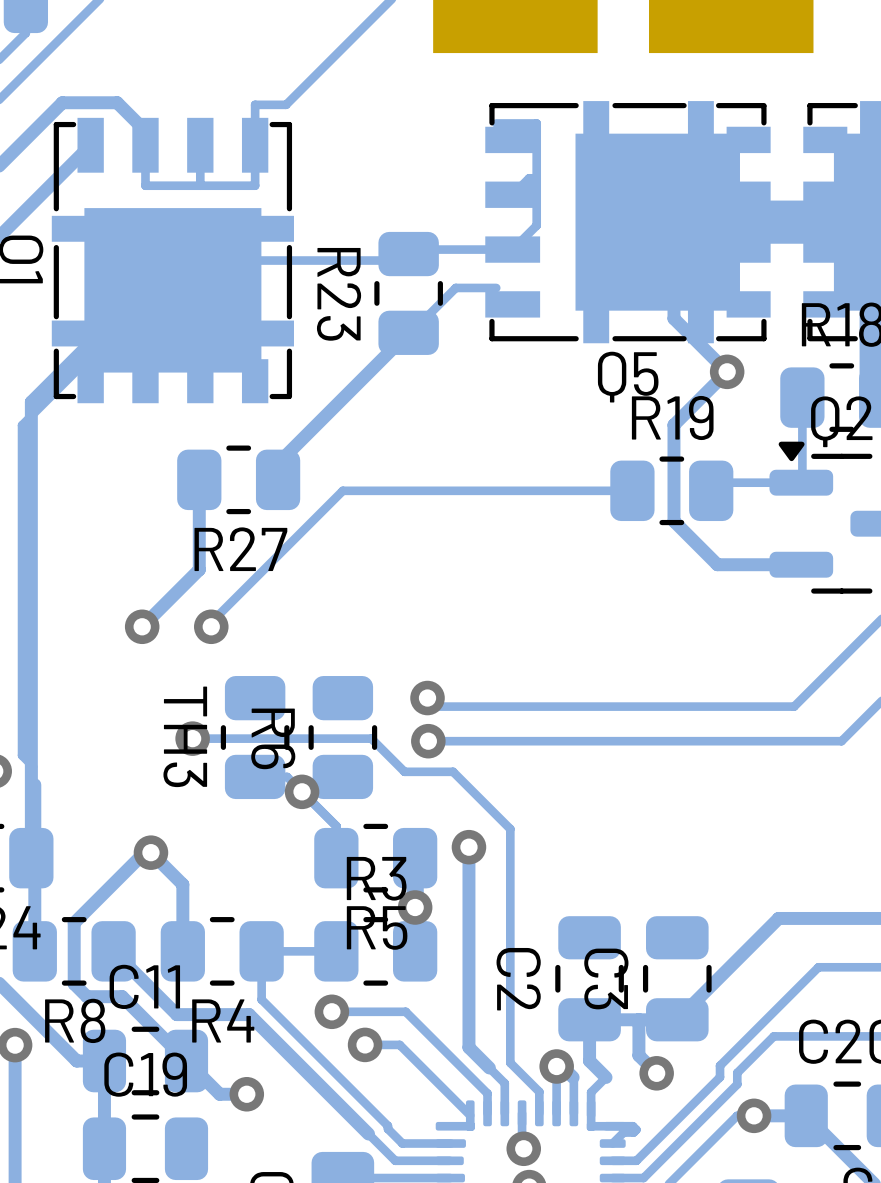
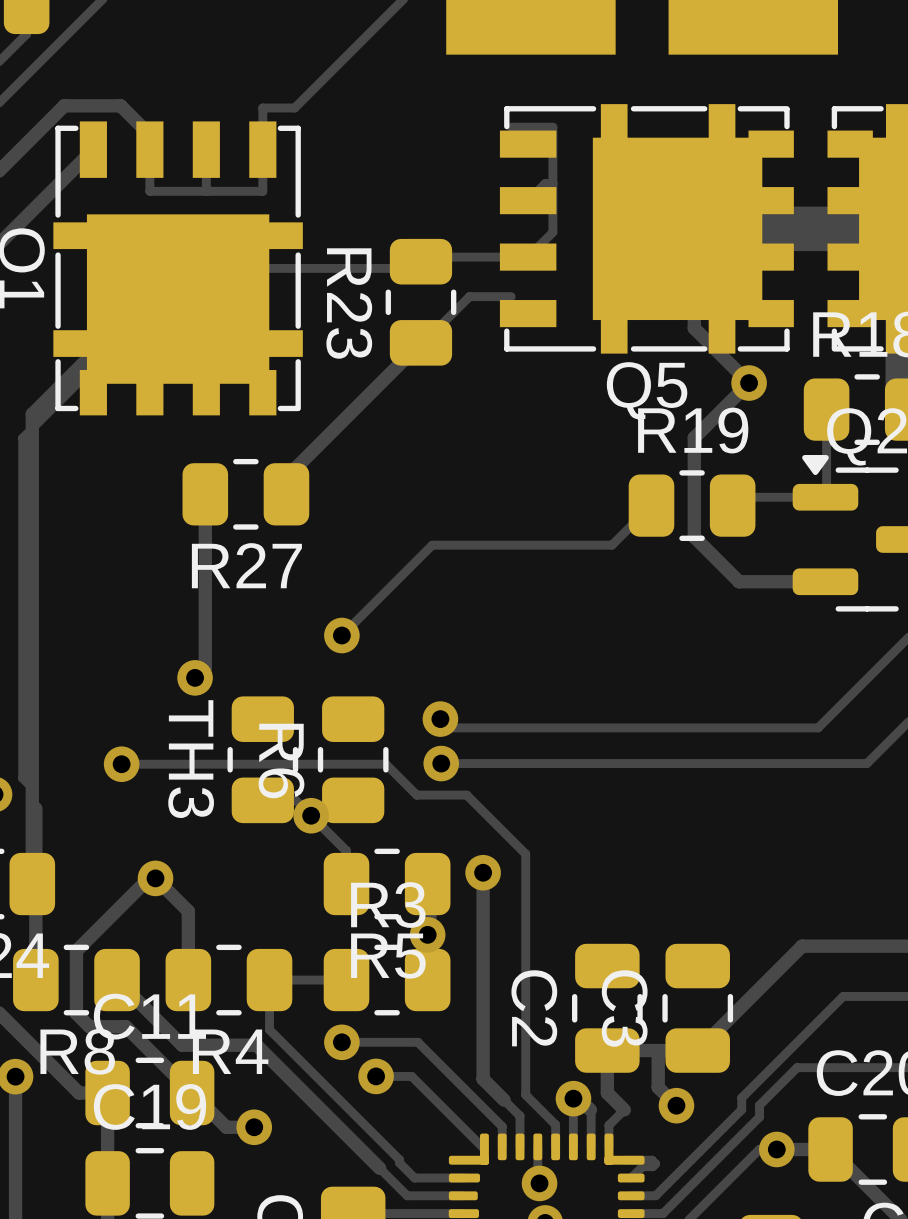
track: (632, 490) (342, 490) (211, 622) (211, 626) -> (651, 505) (611, 545) (432, 545) (341, 635)
track: (199, 569) (142, 626) -> (205, 586) (205, 667) (195, 677)
via: none -> (341, 635)
via: (142, 626) -> none
via position: (211, 626) -> (195, 677)
track: (192, 738) (371, 738) (374, 741) -> (121, 764) (385, 764)
via: (192, 738) -> none
via: none -> (121, 764)

